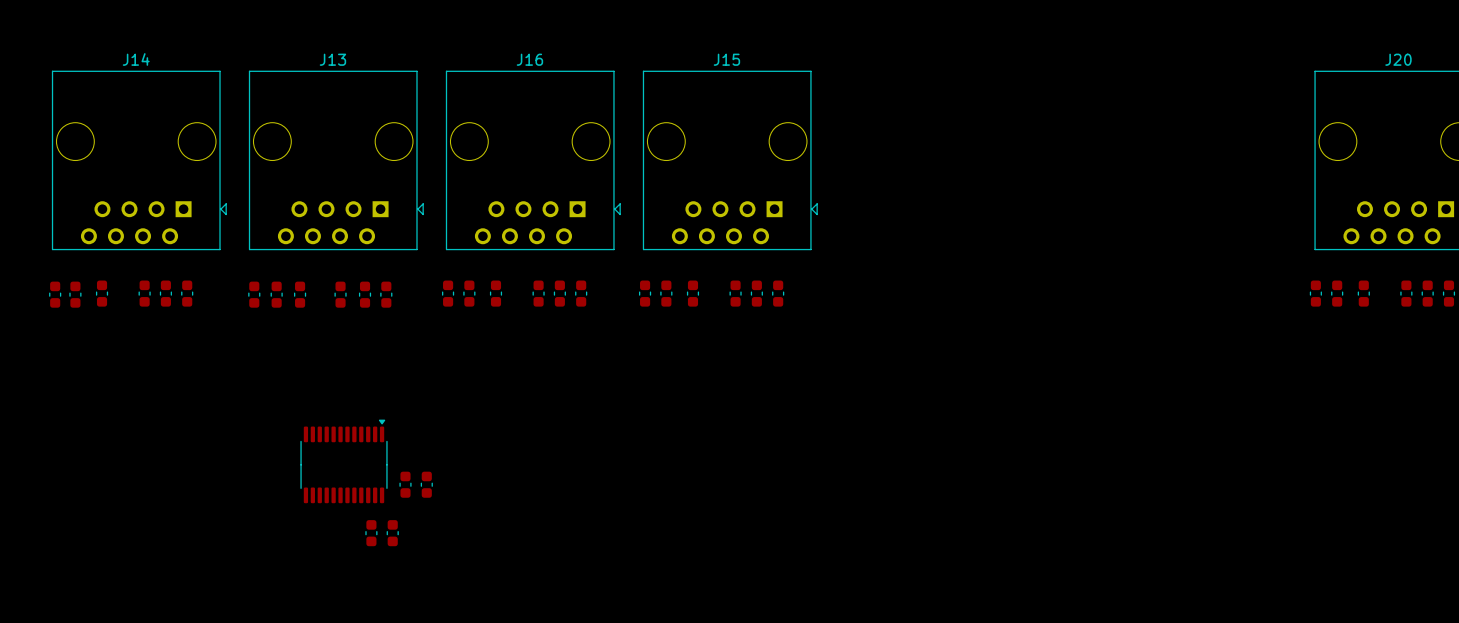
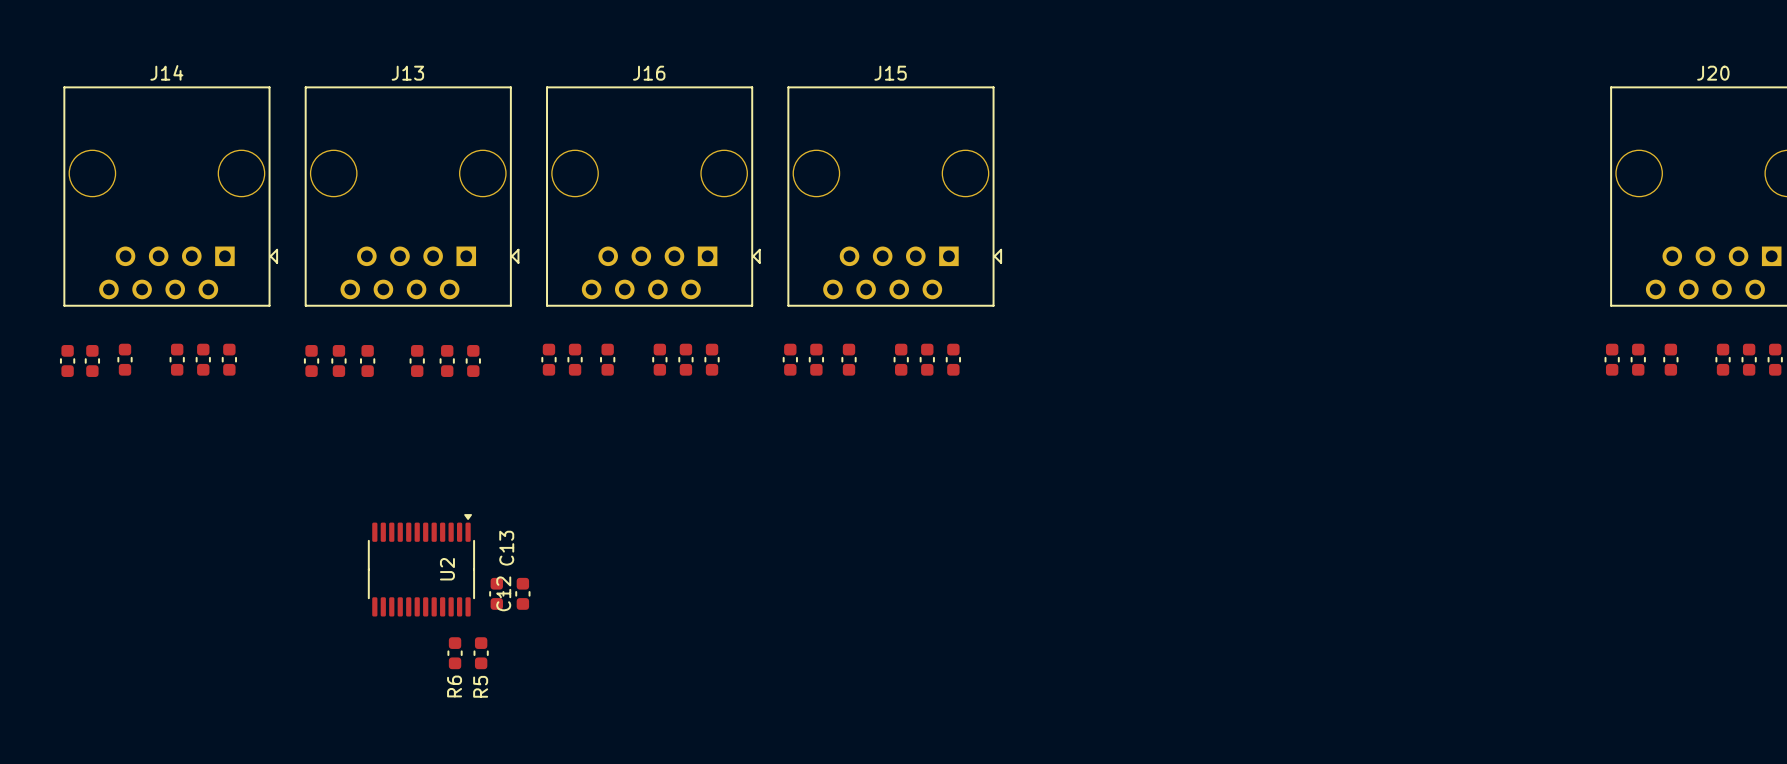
C13 name: none -> C13 (506, 548)
U2 name: none -> U2 (447, 569)
C12 name: none -> C12 (503, 593)
R6 name: none -> R6 (454, 686)
R5 name: none -> R5 (480, 686)

